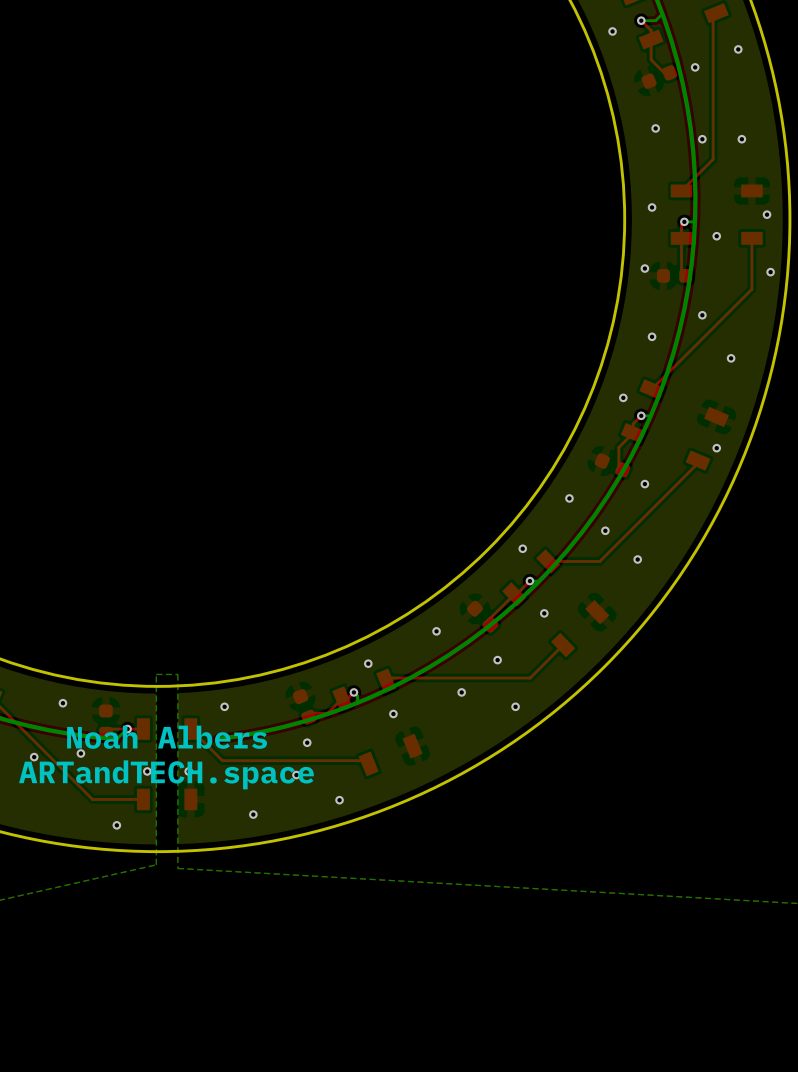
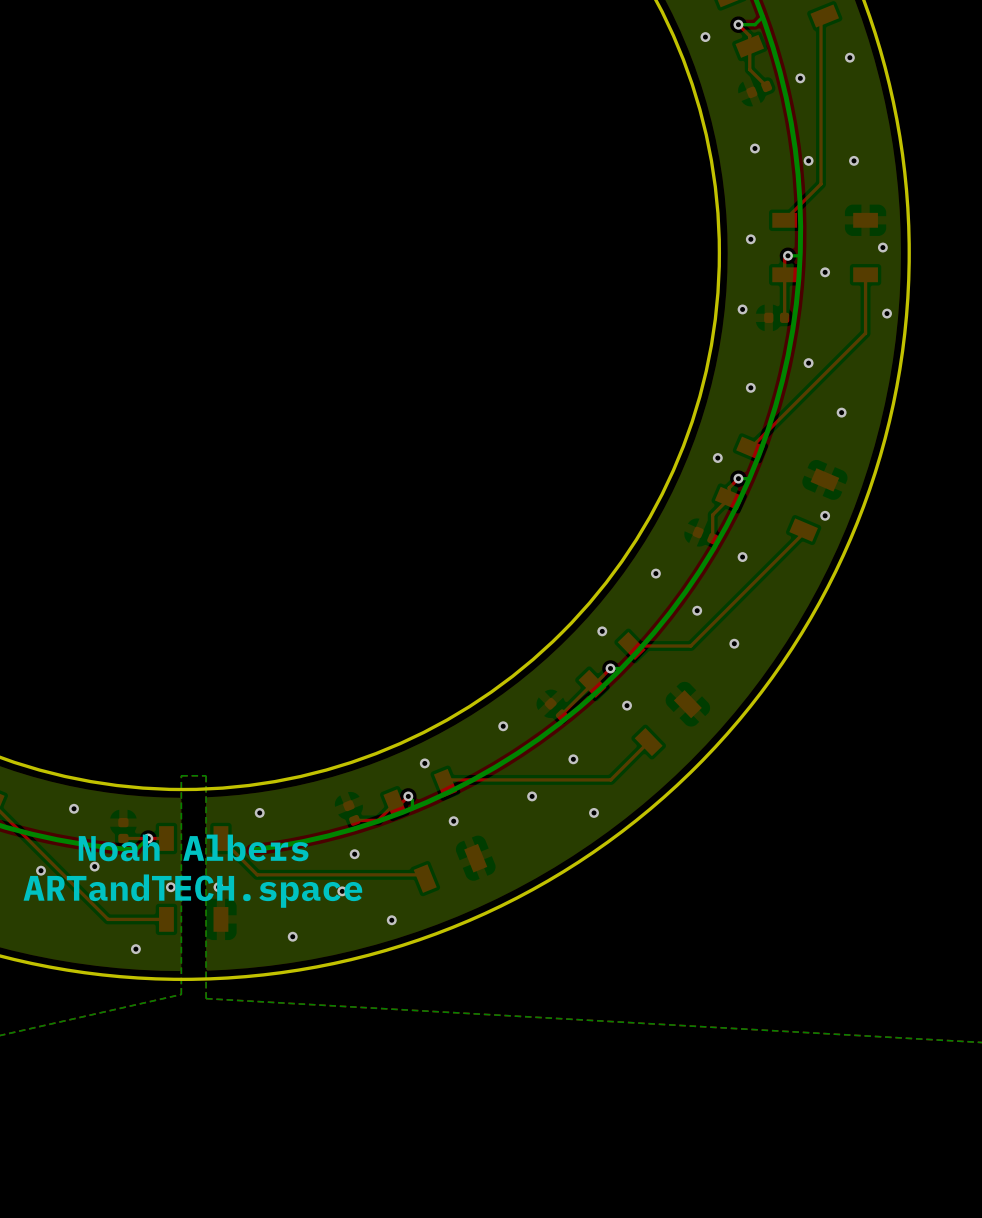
part footprint: [641, 65, 678, 89] -> [746, 80, 773, 99]
part footprint: [656, 269, 693, 283] -> [764, 312, 790, 323]
part footprint: [594, 453, 631, 478] -> [692, 526, 719, 545]
part footprint: [466, 600, 499, 633] -> [544, 697, 568, 722]
part footprint: [292, 689, 317, 725] -> [343, 800, 361, 826]
part footprint: [99, 704, 113, 740] -> [118, 818, 129, 844]

